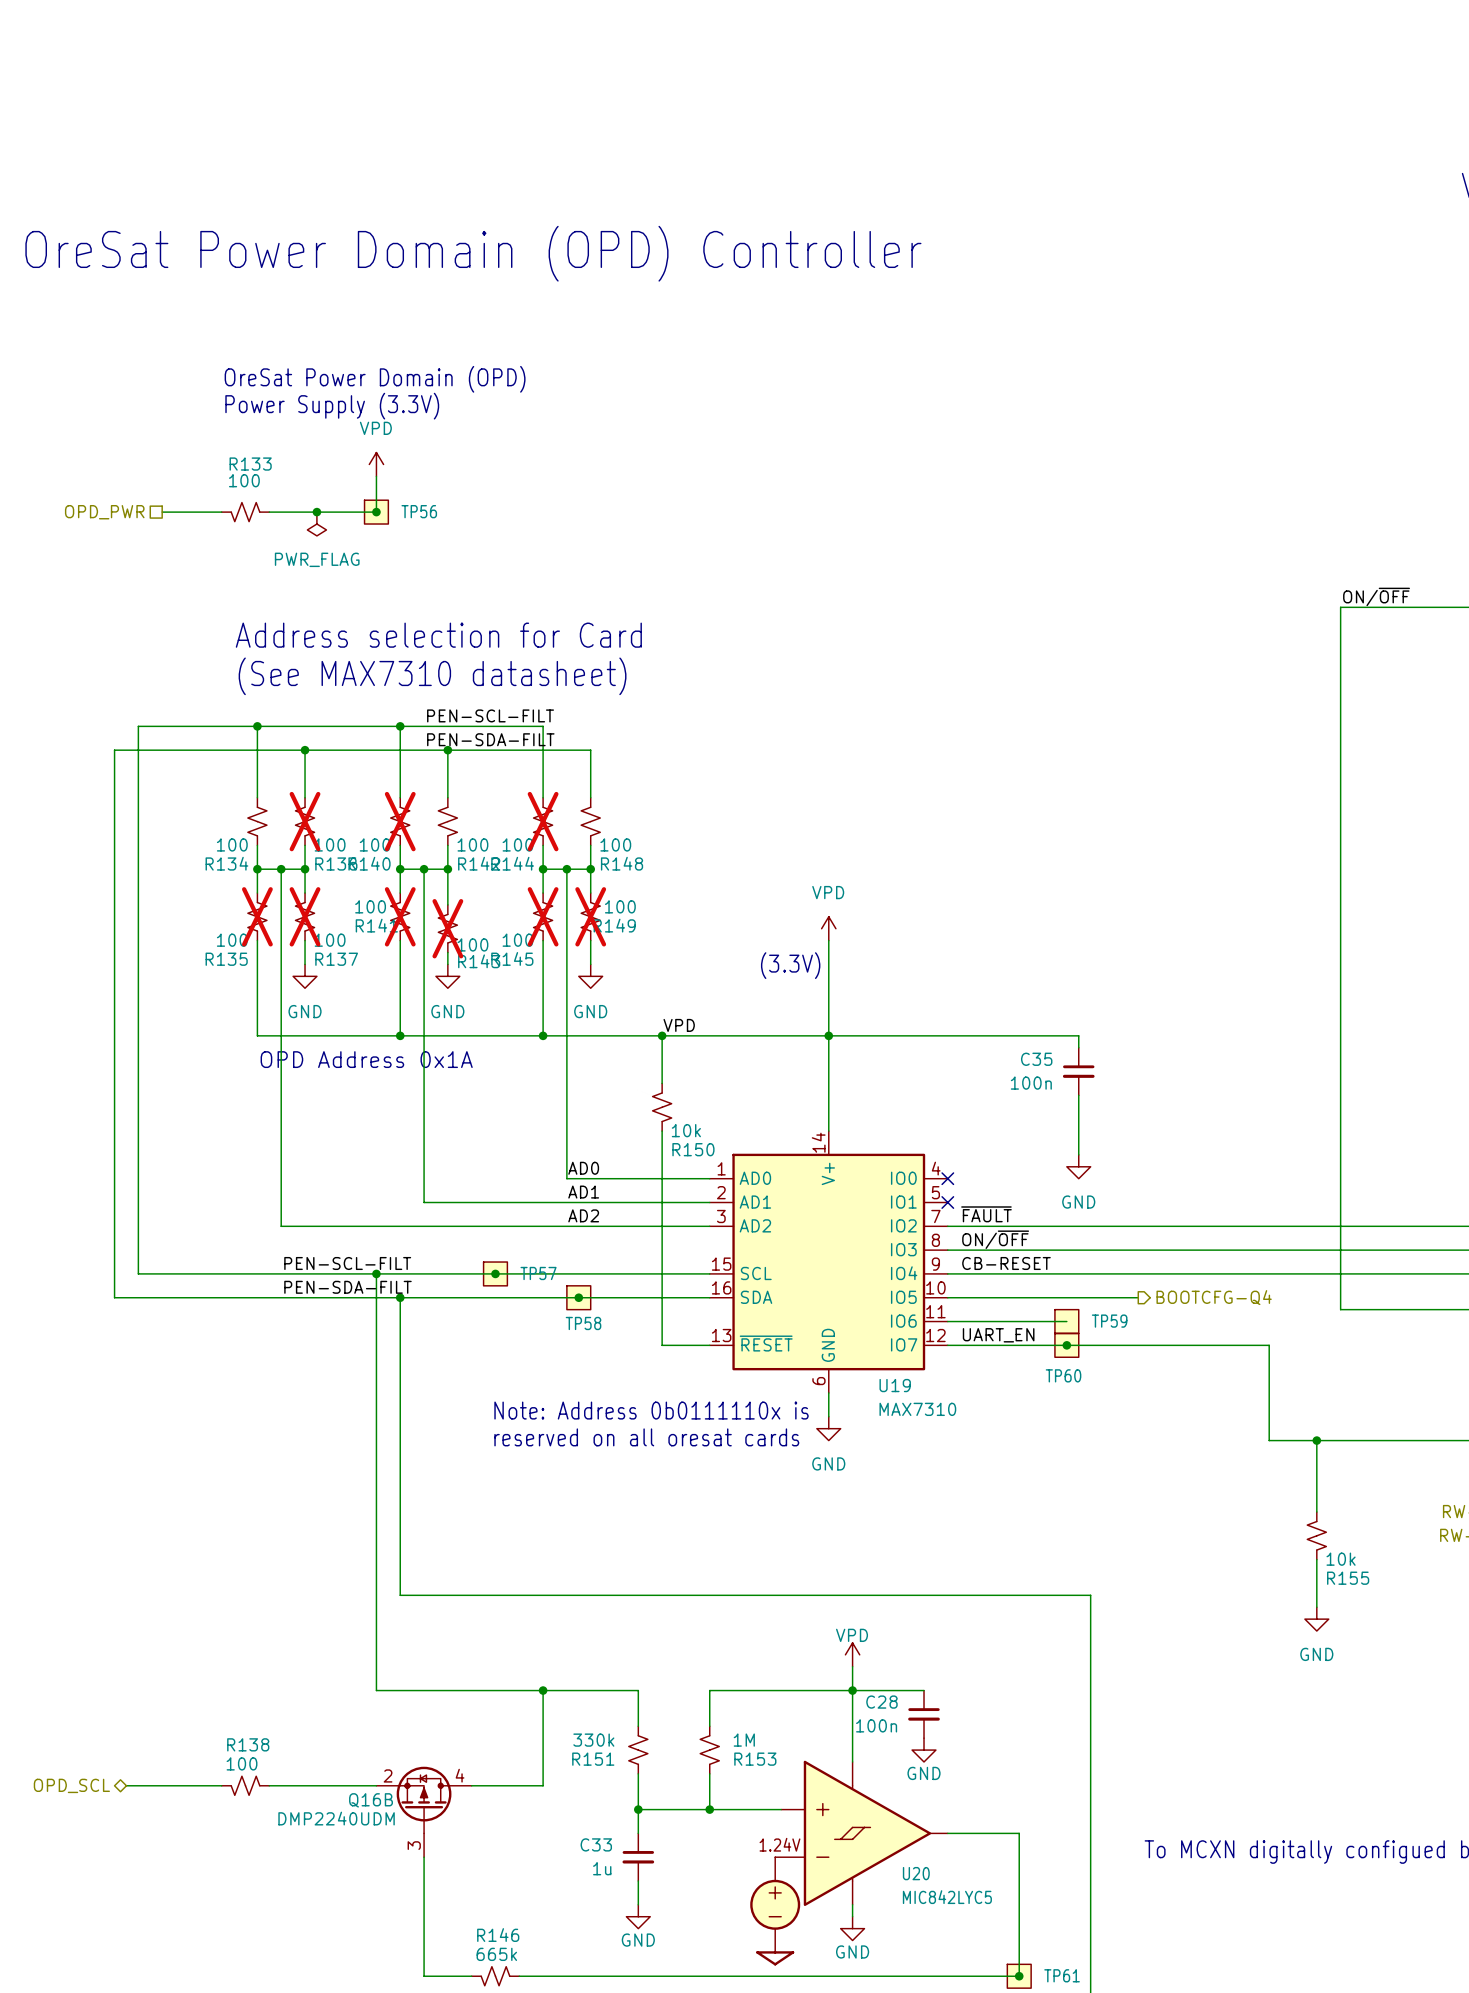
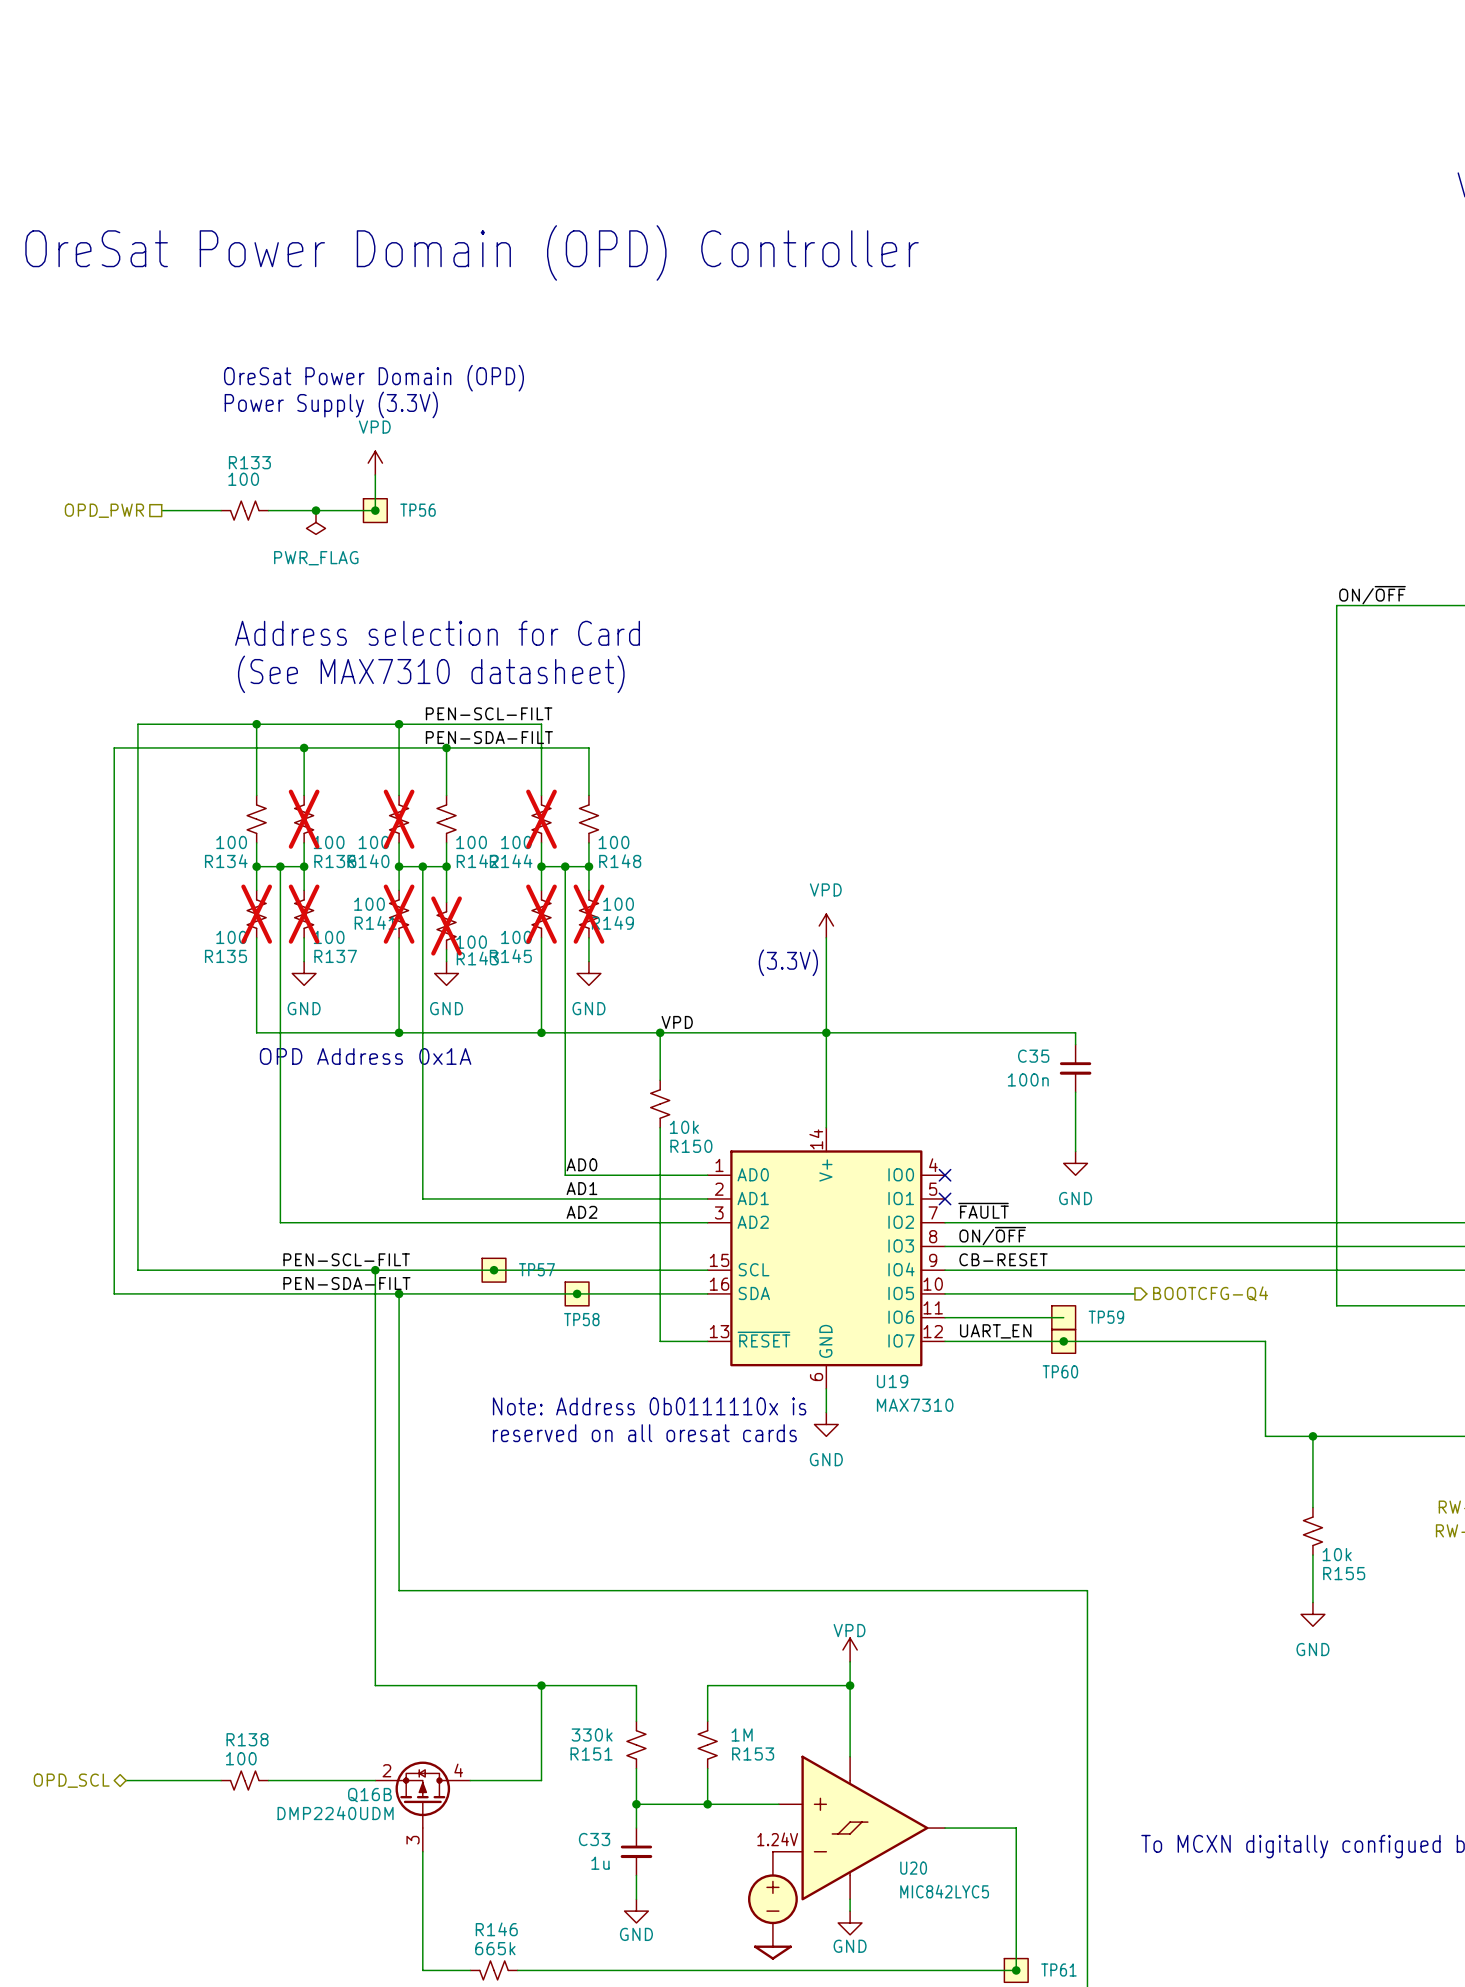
wire: (852, 1690) (924, 1690) -> none
C28: 100n (924, 1714) -> none
power symbol: GND (924, 1750) -> none

